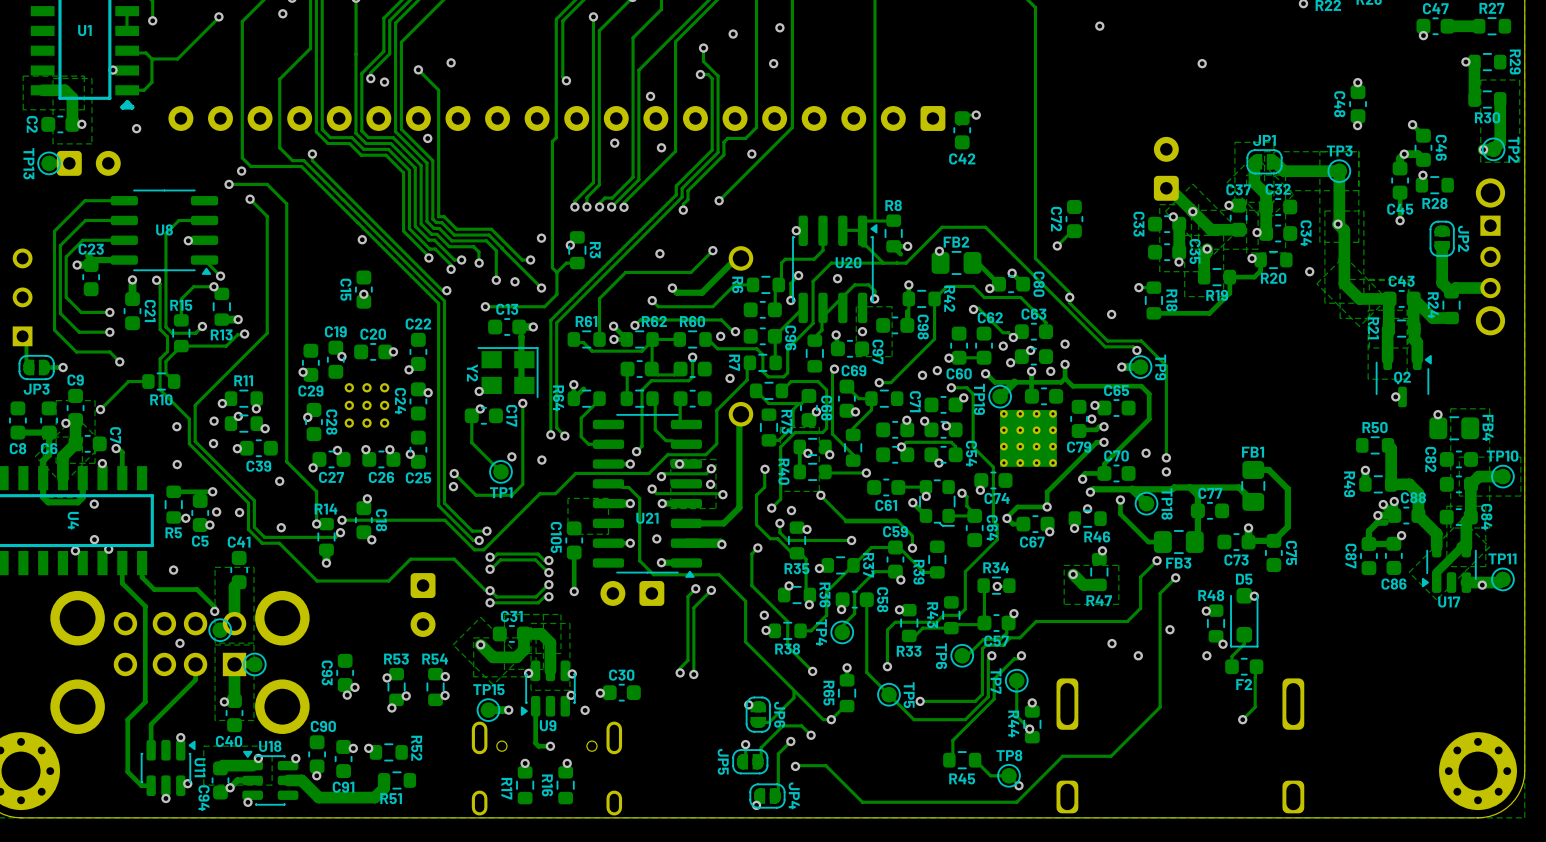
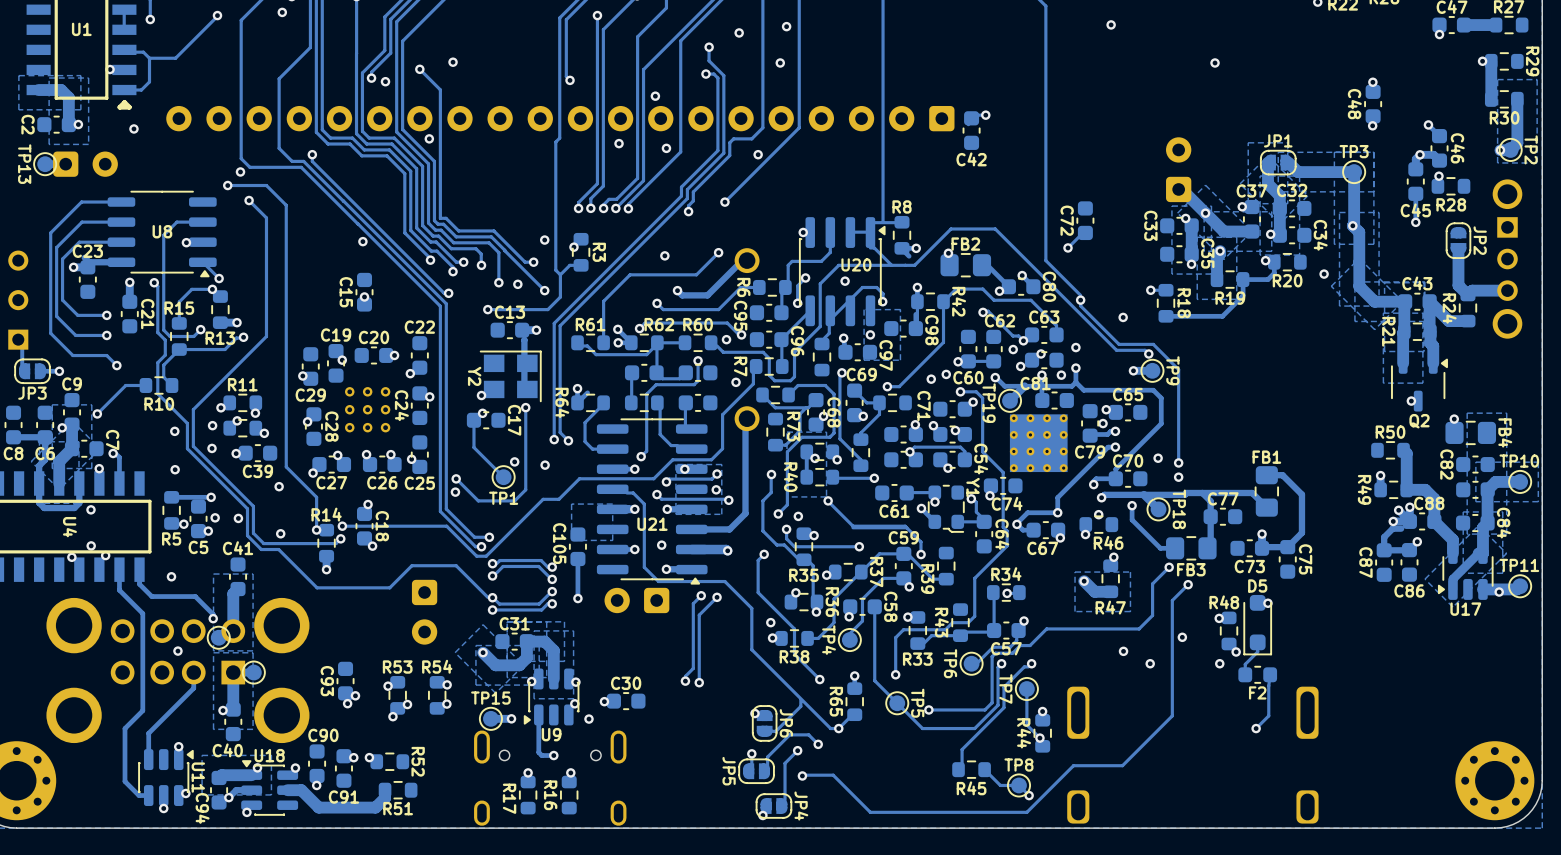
C95 name: none -> C95 (740, 315)
Q2 name position: Q2 (1402, 377) -> Q2 (1419, 421)
C81 name: none -> C81 (1035, 383)
Y1 name: none -> Y1 (973, 487)

